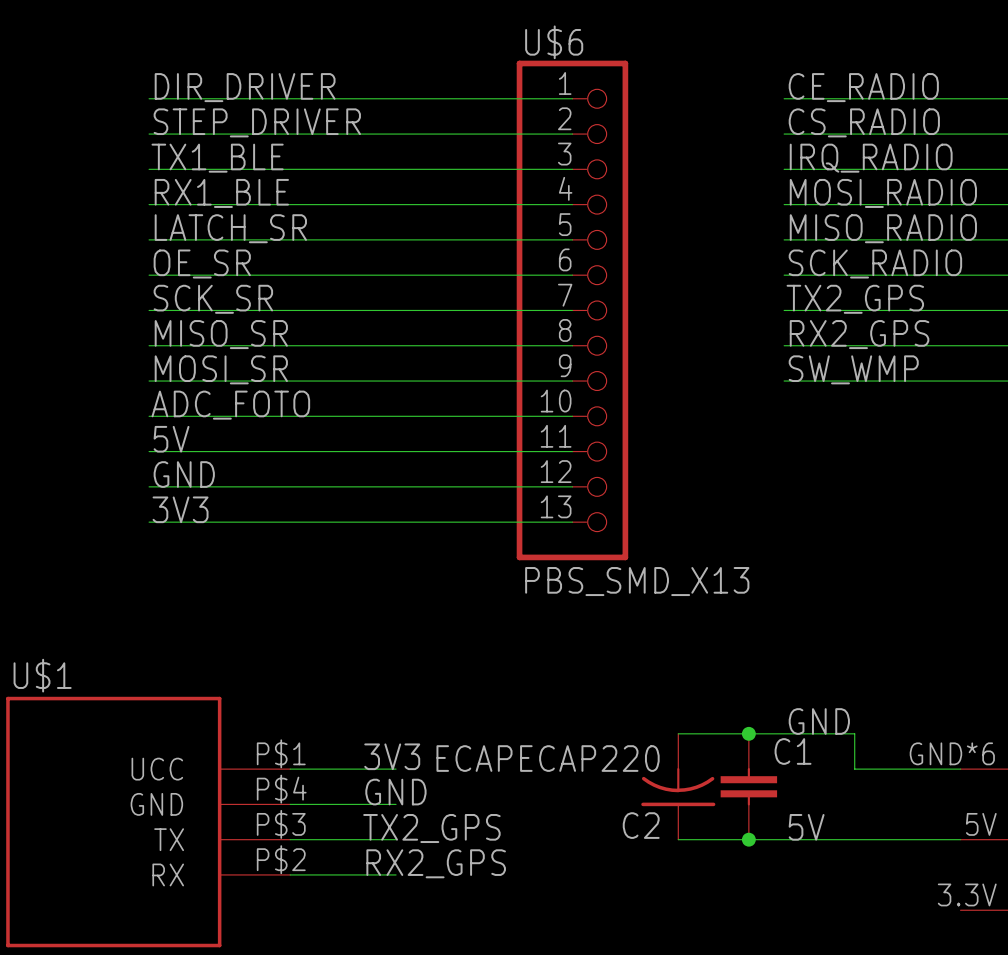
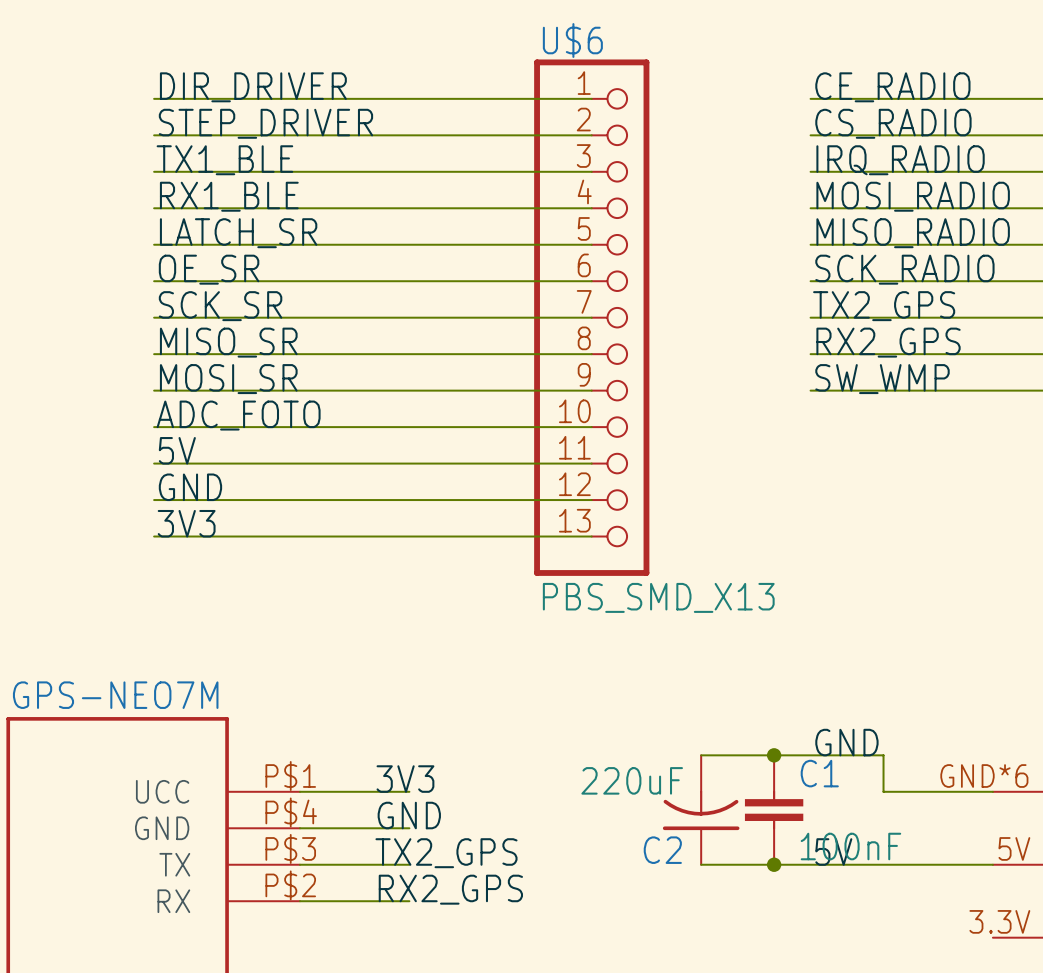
U$1 name: U$1 (42, 675) -> GPS-NEO7M (115, 695)
C2 value: ECAPECAP220 (548, 758) -> 220uF (632, 780)
C1 value: none -> 100nF (850, 846)

